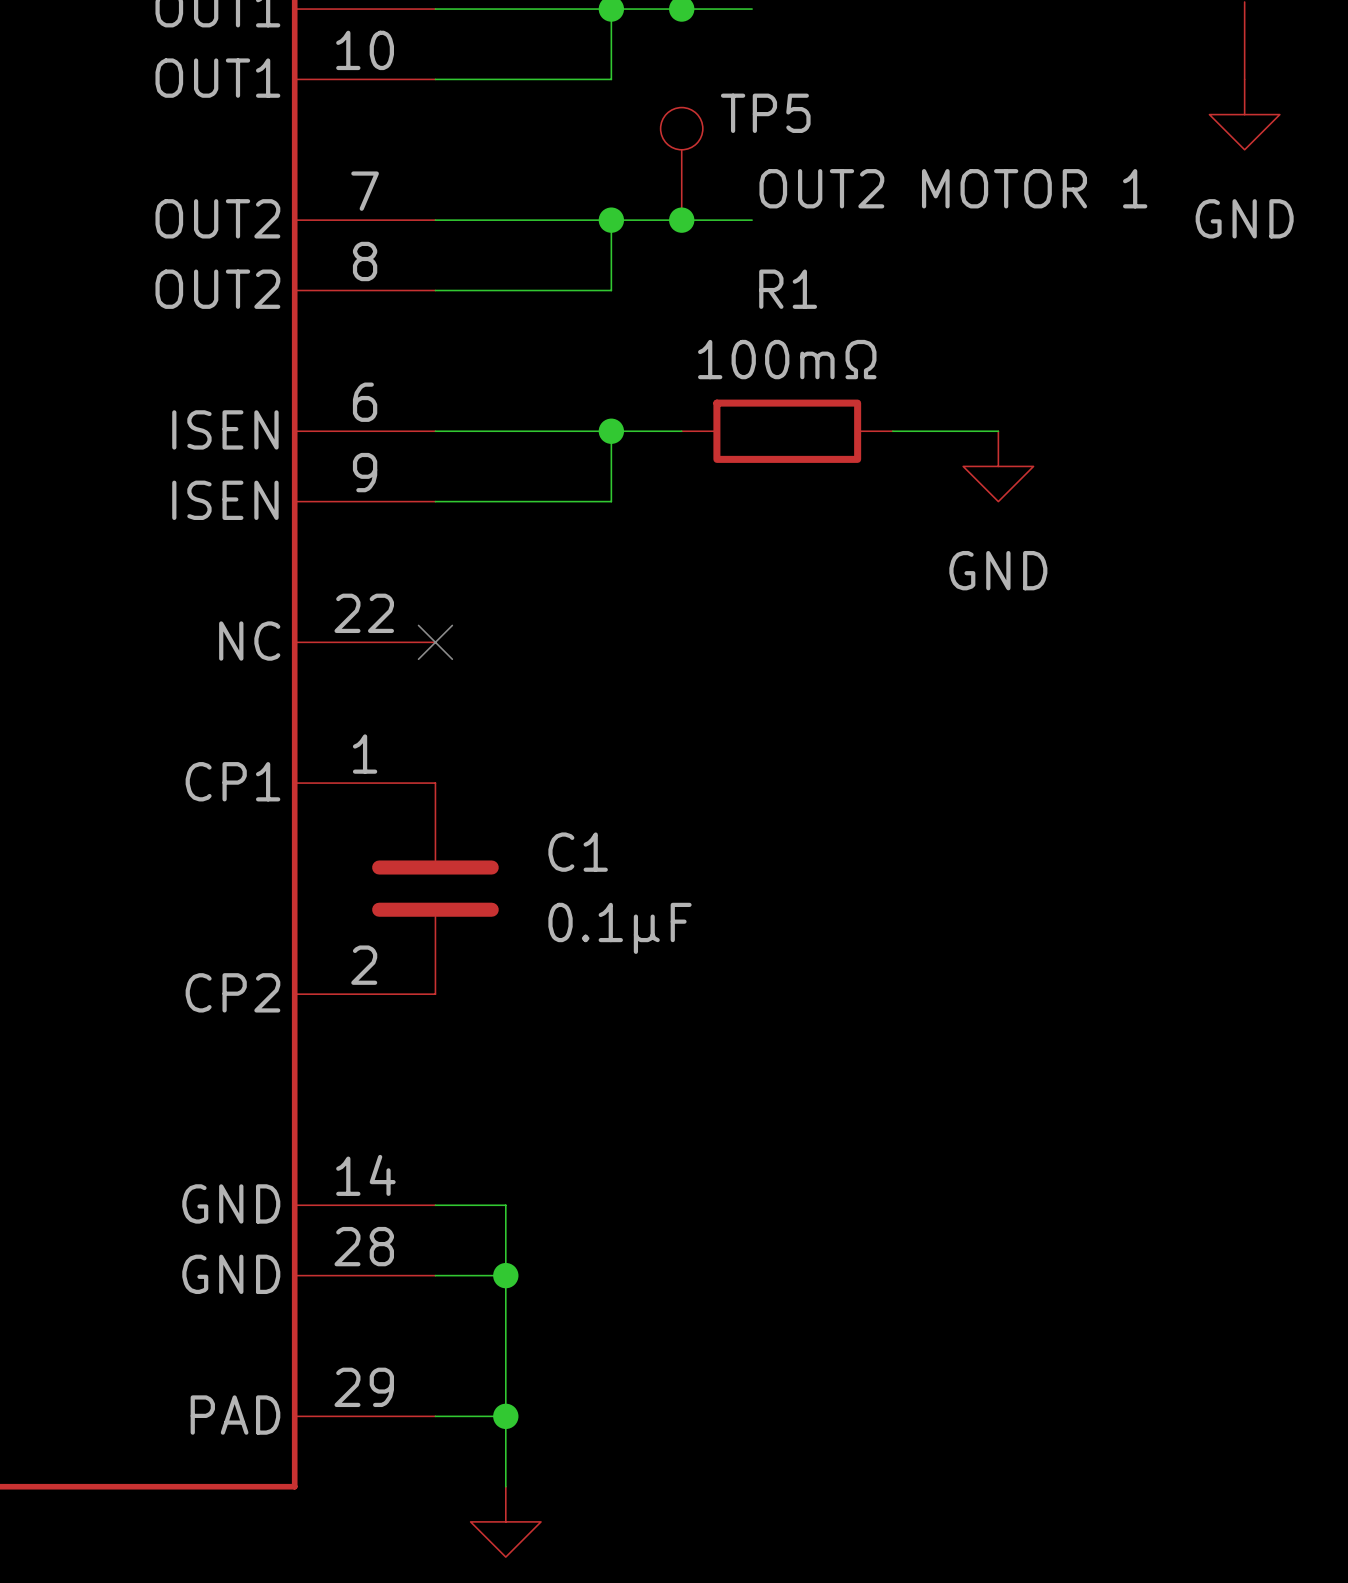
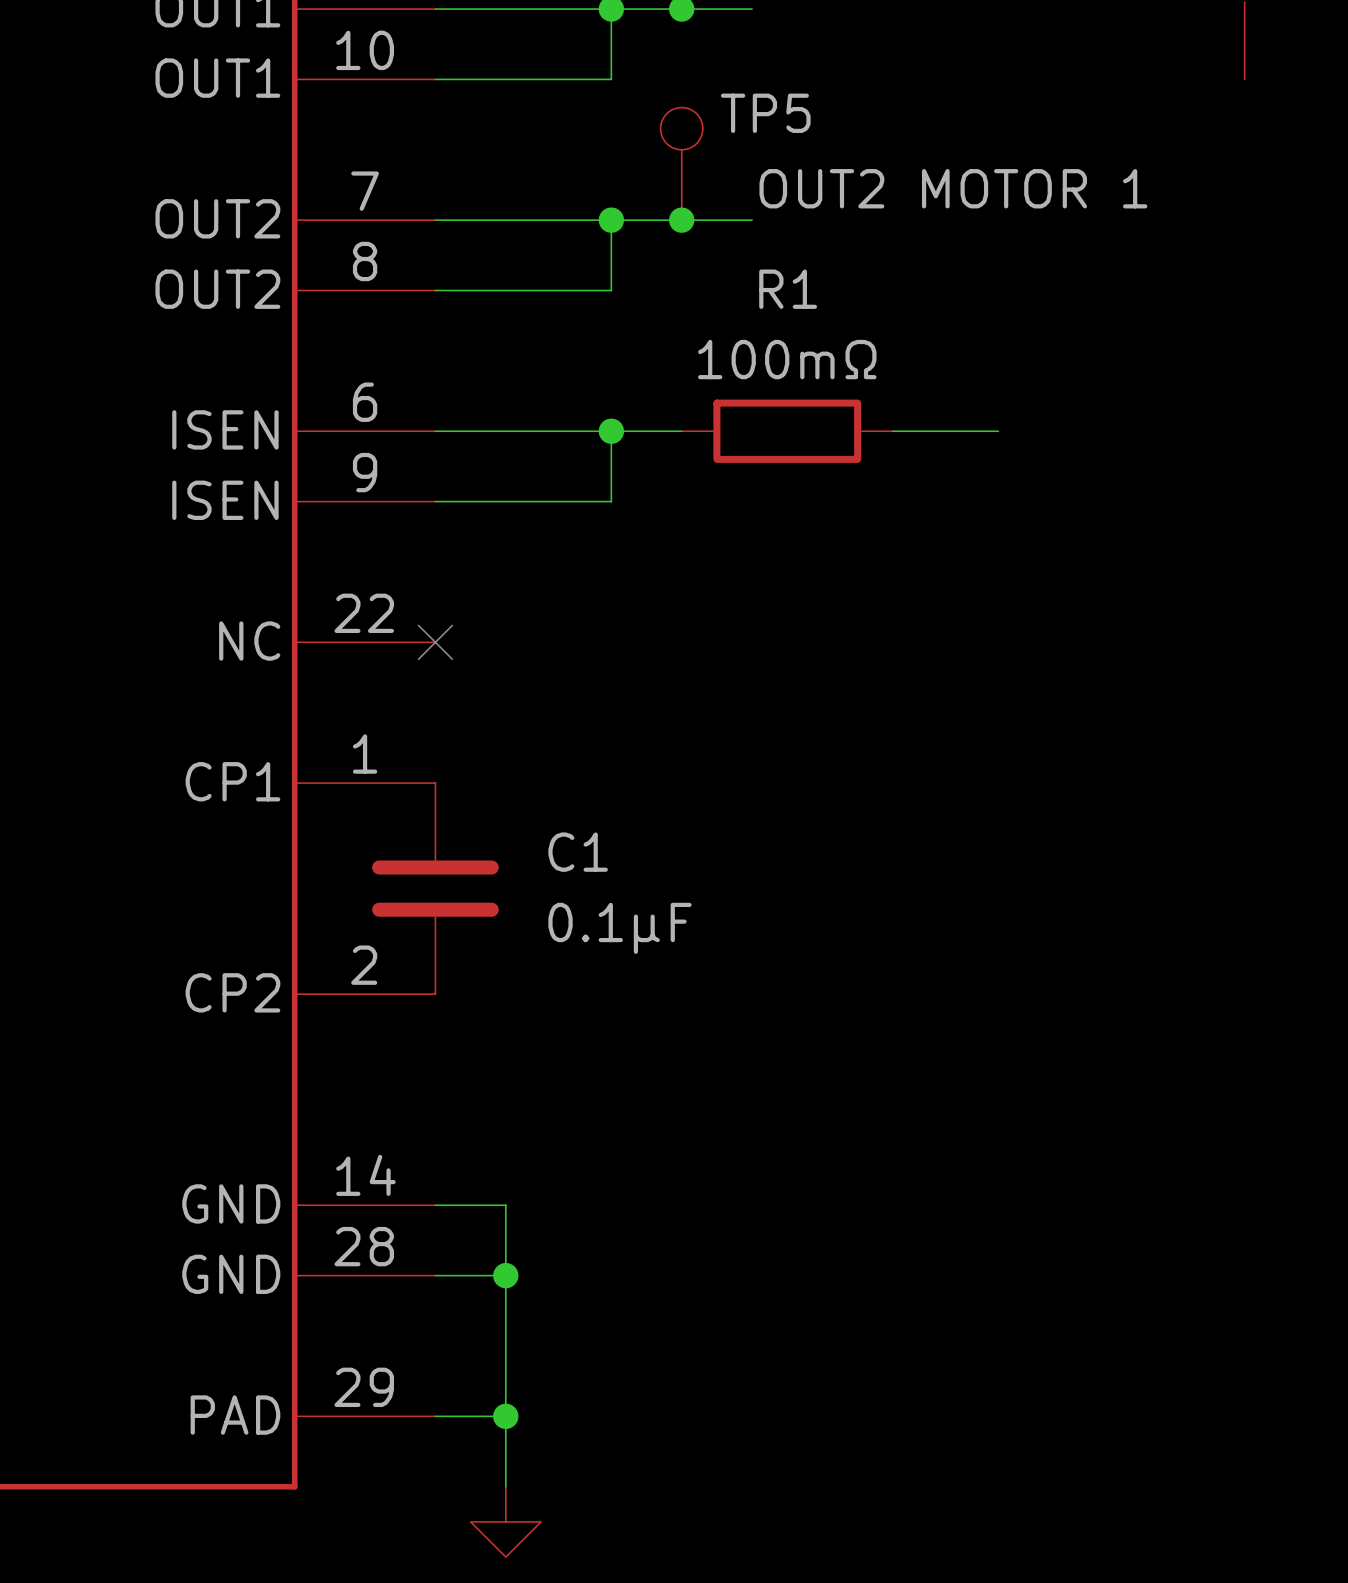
power symbol: GND (1244, 114) -> none
power symbol: GND (998, 466) -> none

